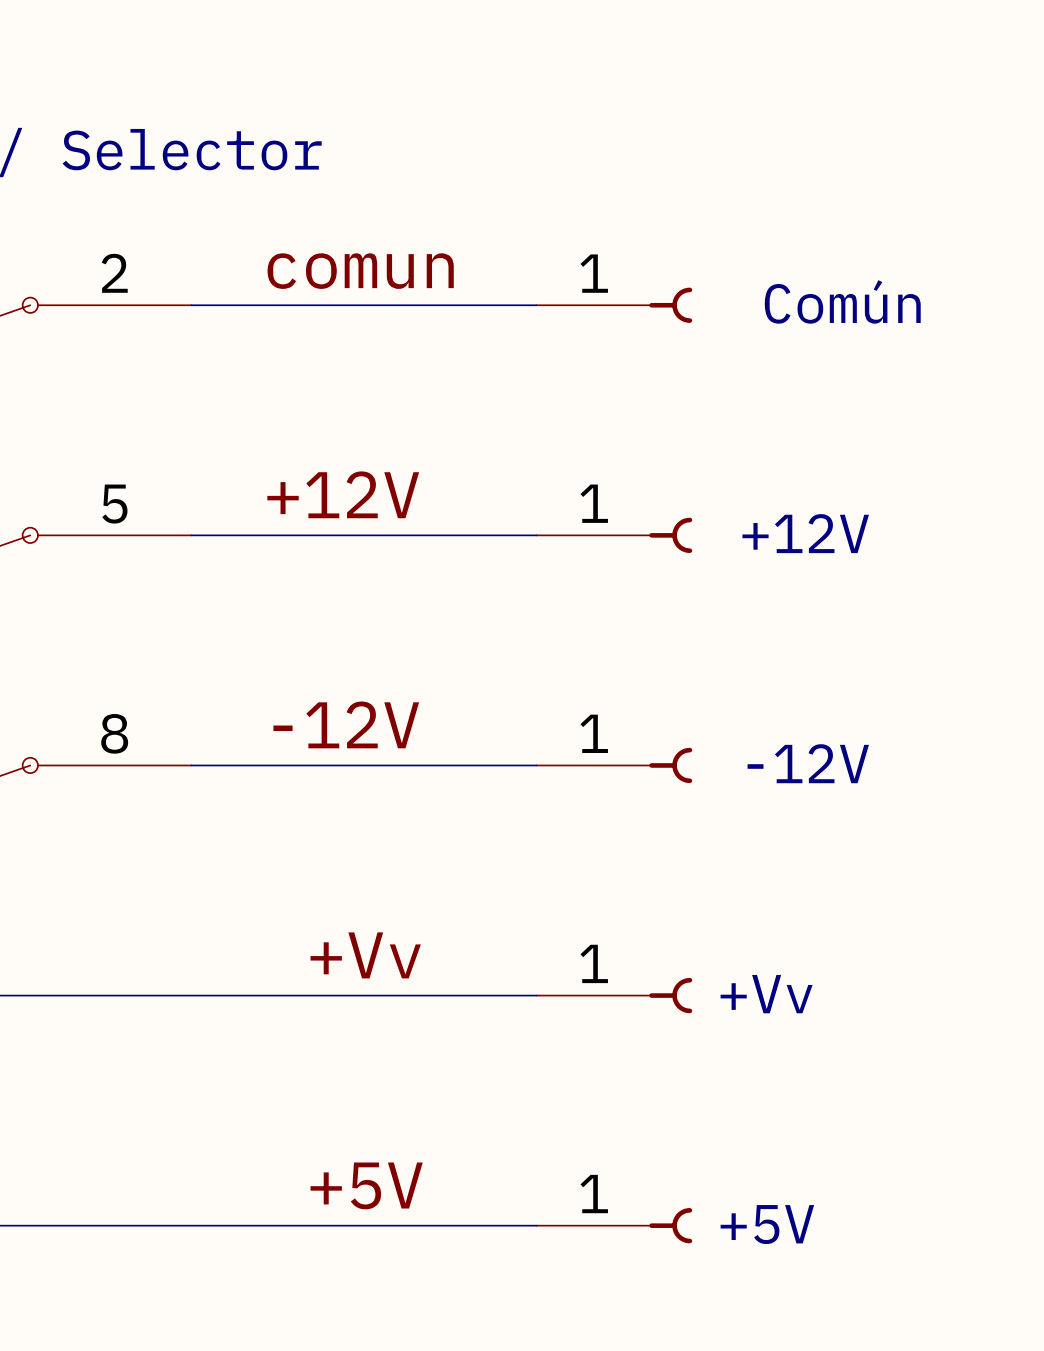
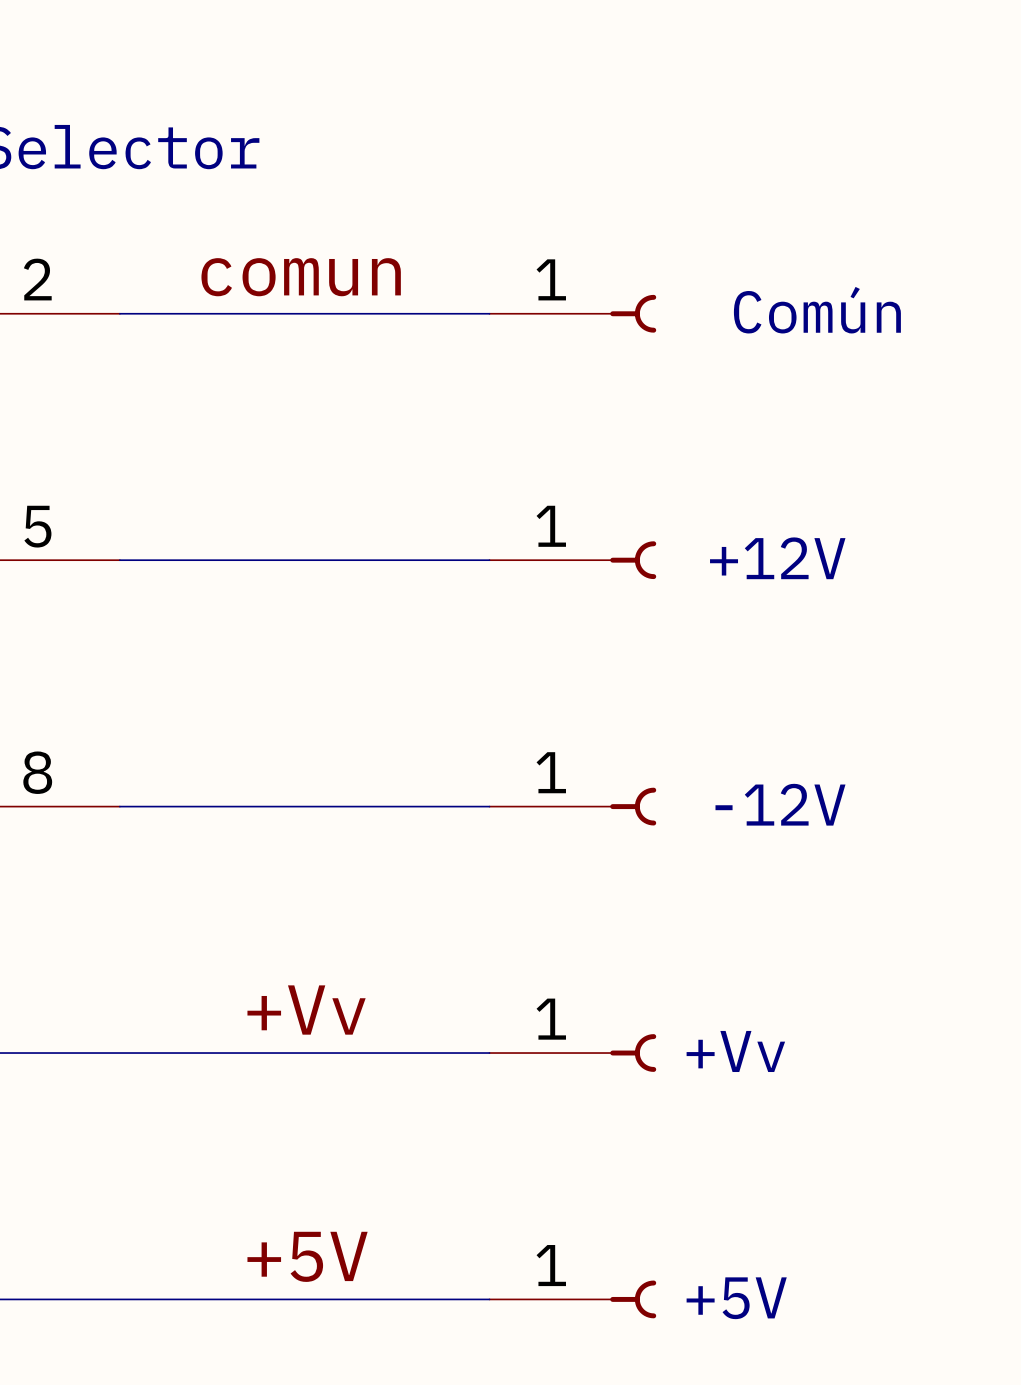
label: +12V (343, 494) -> none
label: -12V (346, 724) -> none

